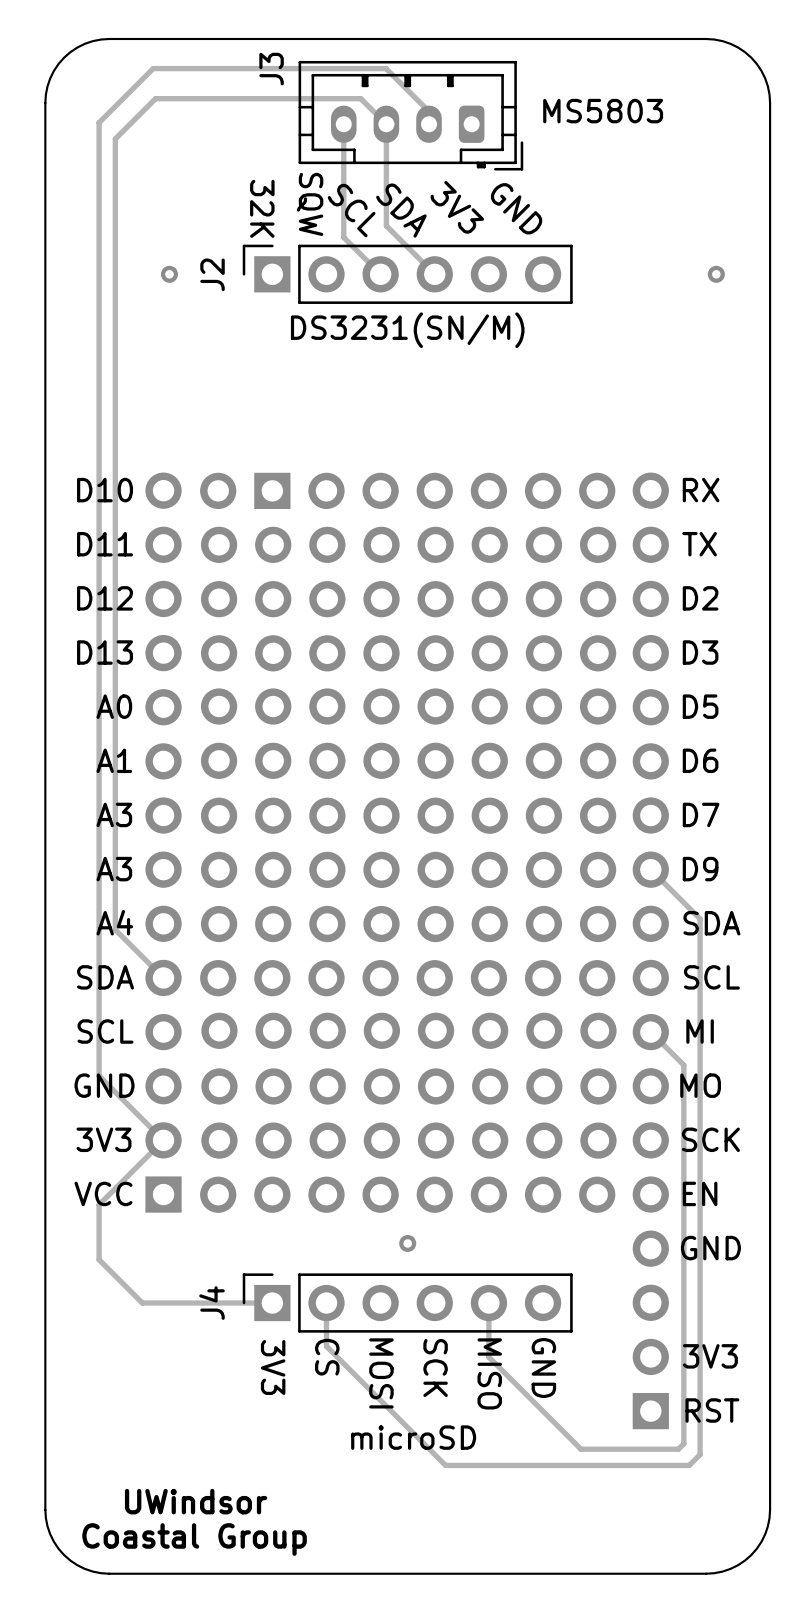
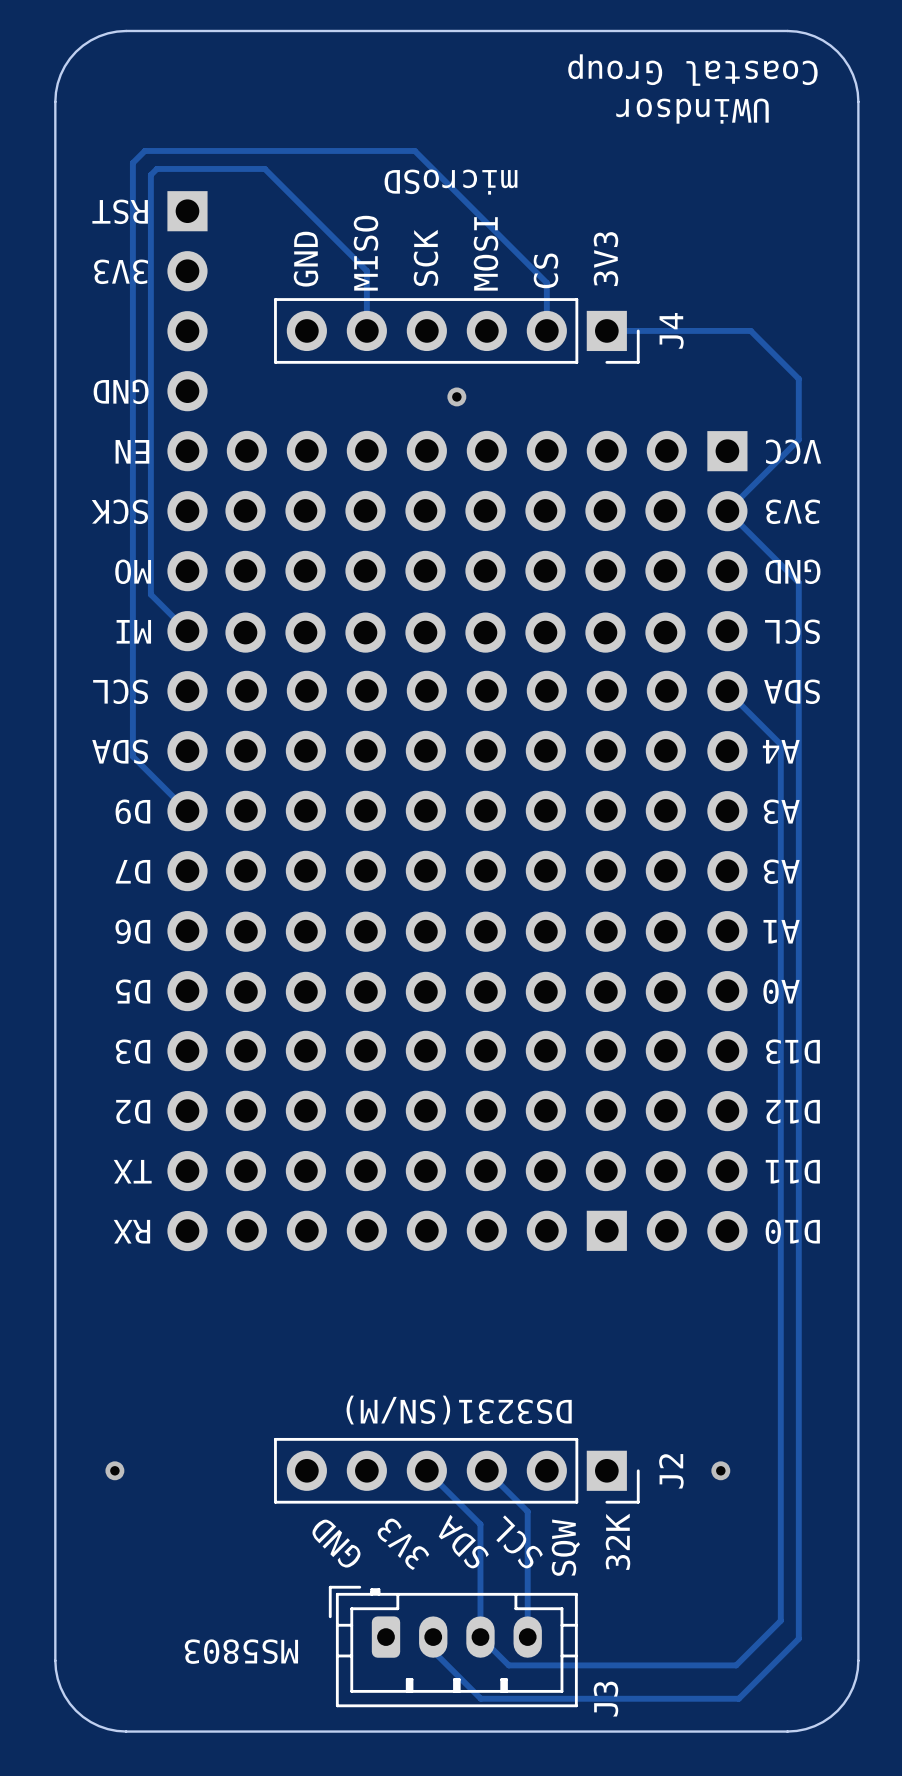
text: none -> Coastal Group (692, 70)
text: MS5803 (603, 111) -> UWindsor (692, 111)
J3 rotation: 0° (410, 115) -> 180° (453, 1646)
J3 position: (410, 115) -> (453, 1646)
track: (343, 124) (343, 237) (380, 274) -> none
track: (429, 124) (429, 111) (386, 68) (153, 68) (99, 122) (99, 1075) (163, 1140) (99, 1204) (99, 1259) (142, 1303) (272, 1303) -> none
track: (115, 158) (115, 138) (155, 98) (360, 98) (386, 124) (386, 225) (434, 274) -> (132, 162) (144, 150) (414, 150) (546, 282) (546, 330)
text: none -> microSD (451, 182)
text: none -> RST (120, 211)
text: SQW (310, 204) -> none
text rotation: 0° (457, 207) -> 135° counterclockwise (605, 259)
text position: 3V3 (457, 207) -> 3V3 (605, 259)
text: 32K (262, 208) -> none
text: GND (516, 208) -> none
text: SCL (351, 210) -> SCK (425, 257)
text: SDA (401, 210) -> none
text: none -> MISO (366, 253)
text: none -> MOSI (485, 253)
text: none -> GND (306, 259)
text: none -> CS (545, 270)
text: none -> 3V3 (121, 271)
via: (169, 274) -> none
J2 rotation: 0° (407, 274) -> 180° (456, 1470)
J2 position: (407, 274) -> (456, 1470)
via: (716, 274) -> none
track: none -> (366, 330) (366, 270) (264, 168) (156, 168) (150, 174) (150, 594) (187, 631)
track: none -> (606, 330) (750, 330) (798, 378) (798, 439) (727, 511) (798, 582) (798, 1638) (738, 1698) (480, 1698) (433, 1651) (433, 1637)
text: DS3231(SN/M) (407, 330) -> none
text: none -> GND (121, 391)
via: none -> (456, 396)
text: none -> EN (132, 451)
text: none -> VCC (793, 451)
text: none -> SCK (119, 511)
text: none -> 3V3 (792, 511)
text: D10 (105, 490) -> none
text: RX (701, 490) -> none
text: none -> MO (133, 571)
text: none -> GND (793, 571)
text: D11 (105, 544) -> none
text: TX (699, 544) -> none
text: none -> MI (133, 631)
text: none -> SCL (792, 631)
text: D12 (105, 598) -> none
text: D2 (700, 598) -> none
text: none -> SCL (120, 691)
text: none -> SDA (792, 691)
text: D13 (105, 652) -> none
text: D3 (700, 652) -> none
part: none -> (187, 721)
text: none -> SDA (120, 751)
text: none -> A4 (781, 751)
track: (115, 693) (115, 929) (163, 977) -> (132, 756) (187, 811)
text: A0 (114, 706) -> none
text: D5 (700, 706) -> none
text: none -> D9 (132, 811)
text: none -> A3 (781, 811)
text: A1 (114, 760) -> none
text: D6 (700, 760) -> none
text: none -> D7 (133, 871)
text: none -> A3 (781, 871)
text: A3 (114, 814) -> none
text: D7 (701, 814) -> none
part rotation: 0° (163, 842) -> 180° (727, 841)
part position: (163, 842) -> (727, 841)
part rotation: 0° (408, 842) -> 180° (456, 840)
text: none -> D6 (132, 931)
text: none -> A1 (781, 931)
text: A3 (114, 869) -> none
track: (650, 869) (700, 918) -> (727, 691) (780, 744) (780, 1006)
text: D9 (700, 869) -> none
text: none -> D5 (133, 991)
text: none -> A0 (781, 991)
text: A4 (114, 922) -> none
text: SDA (711, 923) -> none
part: (650, 950) -> none
text: none -> D3 (133, 1051)
text: none -> D13 (792, 1051)
text: SDA (105, 977) -> none
text: SCL (711, 977) -> none
text: none -> D2 (133, 1111)
text: none -> D12 (793, 1111)
text: SCL (105, 1031) -> none
text: MI (700, 1031) -> none
track: (650, 1032) (683, 1065) (683, 1443) (678, 1449) (580, 1449) (488, 1357) (488, 1303) -> none
text: none -> TX (132, 1171)
text: none -> D11 (792, 1171)
text: GND (104, 1085) -> none
text: MO (700, 1085) -> none
text: none -> RX (131, 1231)
text: none -> D10 (792, 1231)
text: 3V3 (104, 1139) -> none
text: SCK (710, 1139) -> none
text: VCC (103, 1193) -> none
text: EN (700, 1193) -> none
via: (407, 1243) -> none
text: GND (710, 1248) -> none
text: none -> DS3231(SN/M) (459, 1410)
track: (326, 1303) (326, 1346) (445, 1465) (689, 1465) (700, 1454) -> (426, 1470) (480, 1524) (480, 1637) (508, 1665) (736, 1665) (780, 1620) (780, 1599)
J4 rotation: 0° (407, 1303) -> 180° (456, 330)
J4 position: (407, 1303) -> (456, 330)
via: none -> (114, 1470)
track: none -> (486, 1470) (527, 1511) (527, 1637)
via: none -> (720, 1470)
text: 3V3 (710, 1356) -> none
text: CS (327, 1357) -> none
text rotation: 0° (273, 1367) -> 135° clockwise (403, 1544)
text position: 3V3 (273, 1367) -> 3V3 (403, 1544)
text: SCK (435, 1367) -> SCL (519, 1541)
text: GND (543, 1367) -> none
text: MOSI (381, 1373) -> none
text: MISO (489, 1373) -> none
text: none -> SDA (463, 1541)
text: none -> GND (336, 1543)
text: none -> 32K (617, 1541)
text: none -> SQW (565, 1547)
text: RST (712, 1410) -> none
text: microSD (413, 1437) -> none
text: UWindsor (196, 1501) -> MS5803 (241, 1651)
text: Coastal Group (194, 1539) -> none

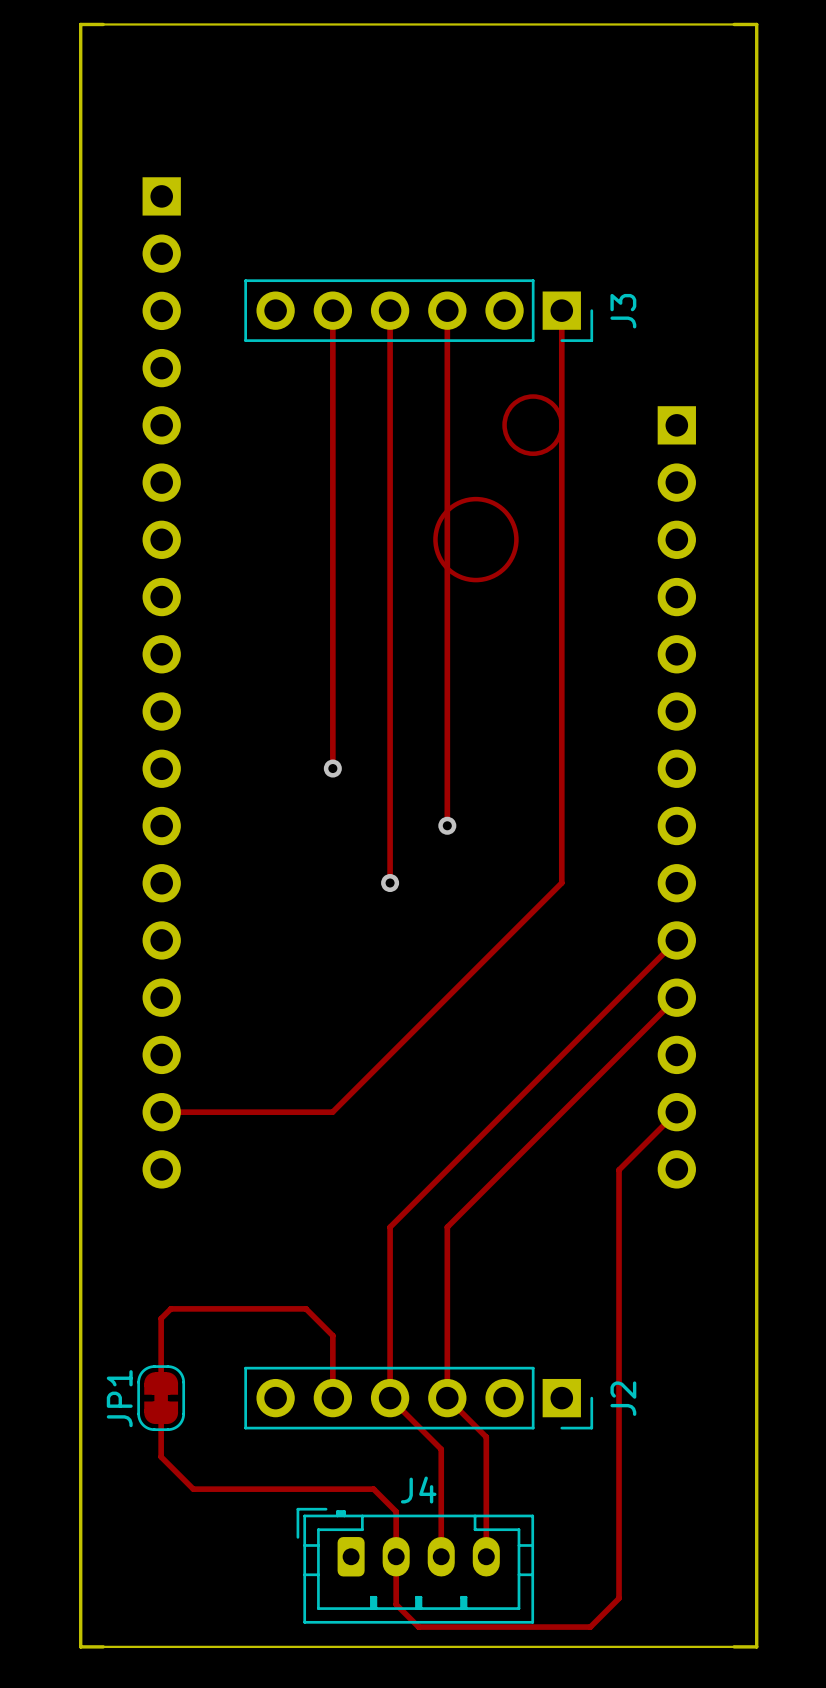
board edge: (126, 30) (99, 36) (76, 51) (60, 74) (55, 101) (55, 1660) (60, 1687) (76, 1710) (99, 1726) (126, 1731) -> (103, 24) (80, 24) (80, 1646) (103, 1646)
board edge: (787, 30) (814, 36) (837, 51) (852, 74) (858, 101) (858, 1660) (852, 1687) (837, 1710) (814, 1726) (787, 1731) -> (734, 24) (756, 24) (756, 1646) (734, 1646)
text: Coastal Group (692, 70) -> none
text: UWindsor (692, 111) -> none
text: microSD (451, 182) -> none
text: RST (120, 211) -> none
text: MISO (366, 253) -> none
text: MOSI (485, 253) -> none
text: SCK (425, 257) -> none
text: GND (306, 259) -> none
text: 3V3 (605, 259) -> none
text: CS (545, 270) -> none
text: 3V3 (121, 271) -> none
track: (366, 330) (366, 270) (264, 168) (156, 168) (150, 174) (150, 594) (187, 631) -> (332, 310) (332, 768)
track: none -> (390, 310) (390, 883)
track: none -> (447, 310) (447, 825)
track: (546, 330) (546, 282) (414, 150) (144, 150) (132, 162) (132, 756) (187, 811) -> none
track: (606, 330) (750, 330) (798, 378) (798, 439) (727, 511) (798, 582) (798, 1638) (738, 1698) (480, 1698) (433, 1651) -> (561, 310) (561, 883) (332, 1112) (161, 1112)
J4 name: J4 (671, 330) -> J3 (623, 311)
text: GND (121, 391) -> none
via: (456, 396) -> none
drawing: none -> [502, 394, 565, 456]
text: EN (132, 451) -> none
text: VCC (793, 451) -> none
text: SCK (119, 511) -> none
text: 3V3 (792, 511) -> none
drawing: none -> [433, 496, 519, 583]
text: MO (133, 571) -> none
text: GND (793, 571) -> none
text: MI (133, 631) -> none
text: SCL (792, 631) -> none
text: SCL (120, 691) -> none
track: (727, 691) (780, 744) (780, 1620) (736, 1665) (508, 1665) (480, 1637) -> none
text: SDA (792, 691) -> none
text: SDA (120, 751) -> none
text: A4 (781, 751) -> none
via: none -> (332, 768)
text: D9 (132, 811) -> none
text: A3 (781, 811) -> none
part: (456, 840) -> none
via: none -> (447, 825)
text: D7 (133, 871) -> none
text: A3 (781, 871) -> none
via: none -> (390, 883)
text: D6 (132, 931) -> none
text: A1 (781, 931) -> none
text: D5 (133, 991) -> none
track: none -> (676, 940) (390, 1227) (390, 1398)
text: A0 (781, 991) -> none
text: D3 (133, 1051) -> none
track: none -> (676, 997) (447, 1227) (447, 1398)
text: D13 (792, 1051) -> none
text: D2 (133, 1111) -> none
text: D12 (793, 1111) -> none
text: TX (132, 1171) -> none
track: none -> (676, 1112) (619, 1169) (619, 1598)
text: D11 (792, 1171) -> none
text: RX (131, 1231) -> none
text: D10 (792, 1231) -> none
text: DS3231(SN/M) (459, 1410) -> none
track: none -> (161, 1383) (161, 1318) (170, 1308) (306, 1308) (332, 1335) (332, 1398)
via: (114, 1470) -> none
JP1: none -> (161, 1398)
via: (720, 1470) -> none
track: none -> (161, 1412) (161, 1456) (193, 1489) (373, 1489) (396, 1511) (396, 1556)
text: SDA (463, 1541) -> none
text: SCL (519, 1541) -> none
text: 32K (617, 1541) -> none
text: GND (336, 1543) -> none
text: 3V3 (403, 1544) -> none
text: SQW (565, 1547) -> none
text: MS5803 (241, 1651) -> none
track: none -> (396, 1570) (396, 1604) (418, 1627) (590, 1627) (619, 1598)
J3 name: J3 (605, 1699) -> J4 (418, 1490)

